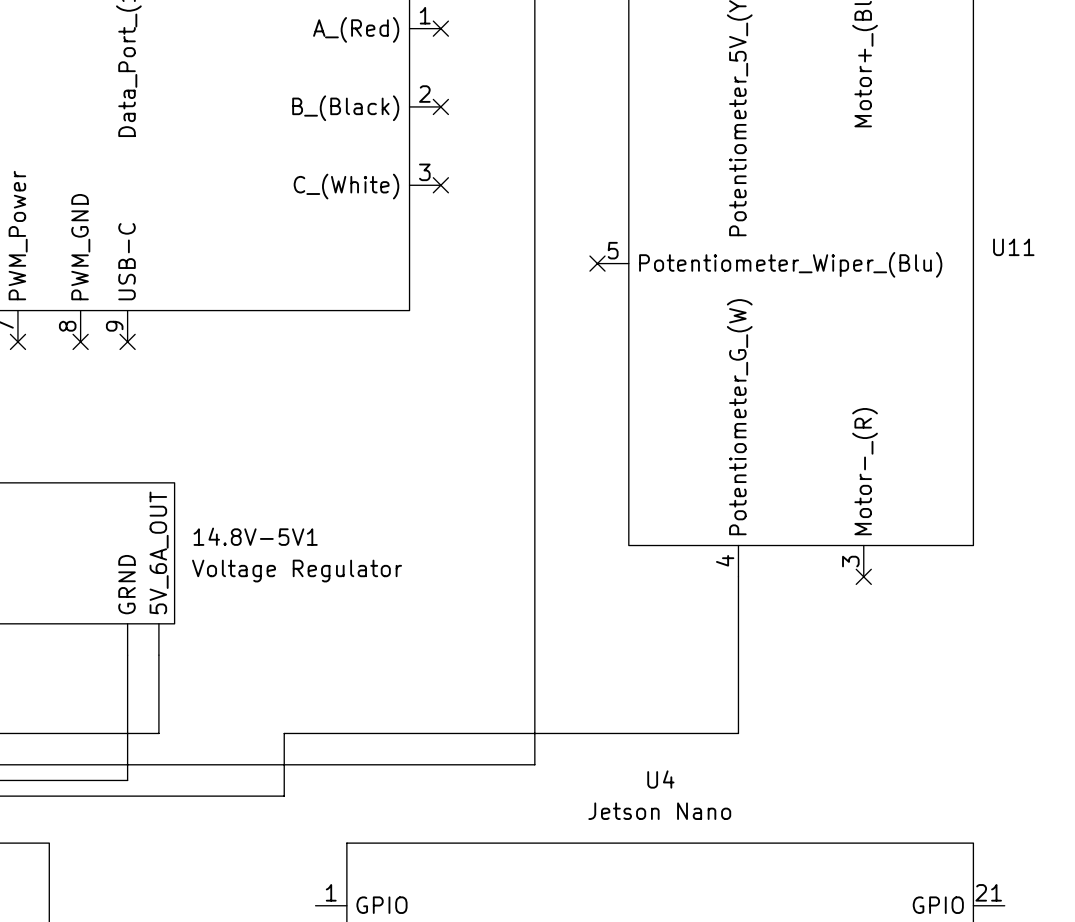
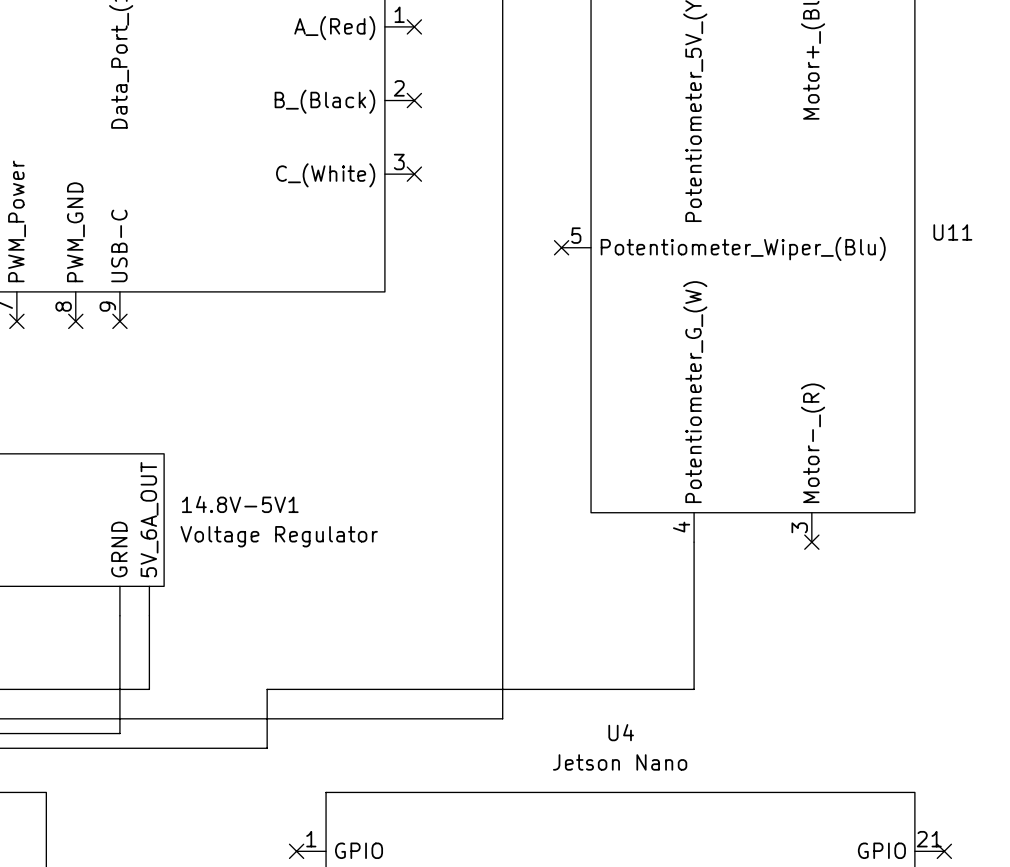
no-connect mark: none -> (296, 851)
no-connect mark: none -> (944, 851)

